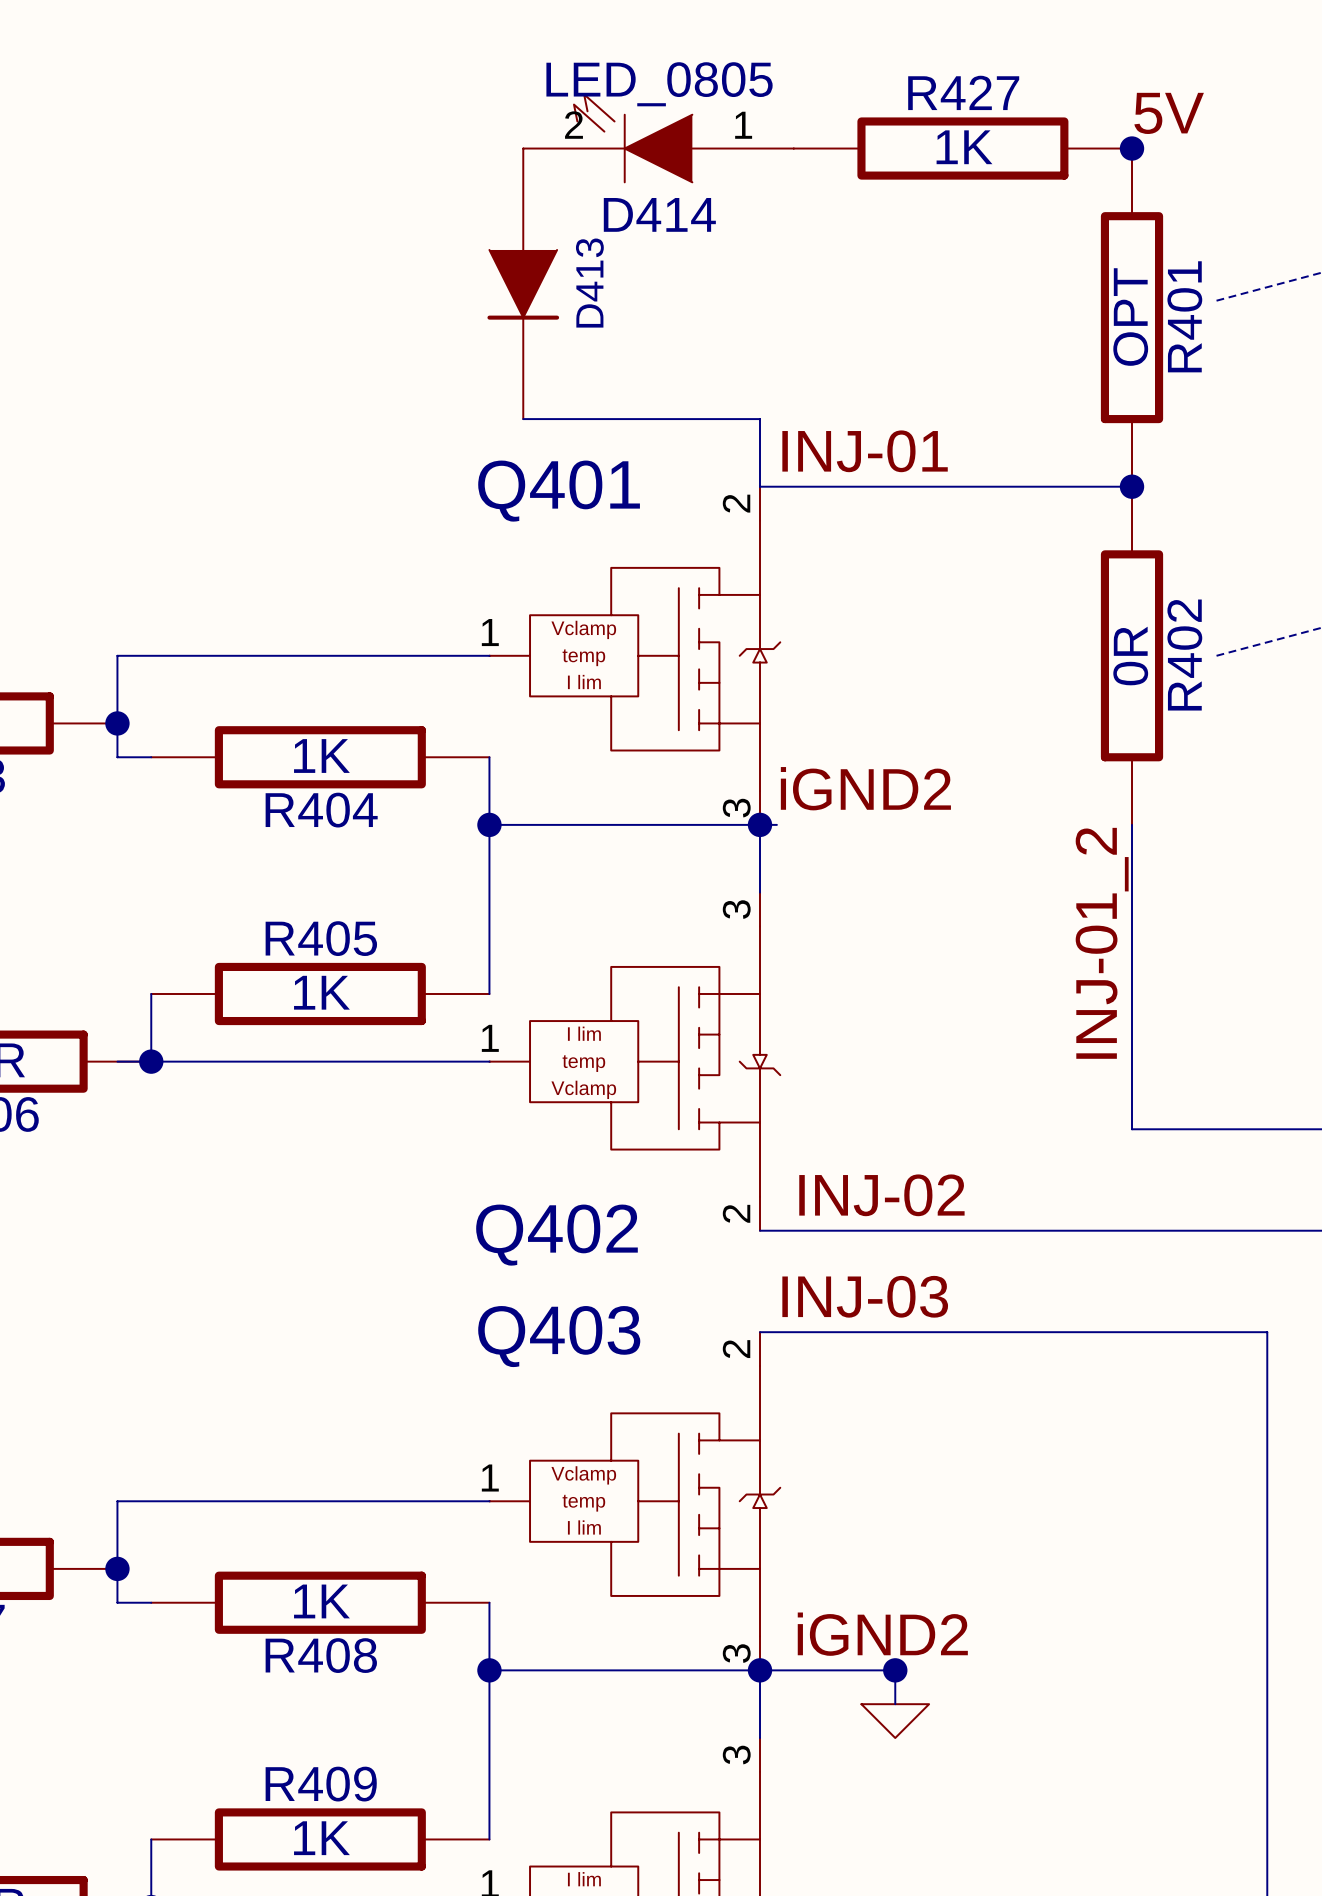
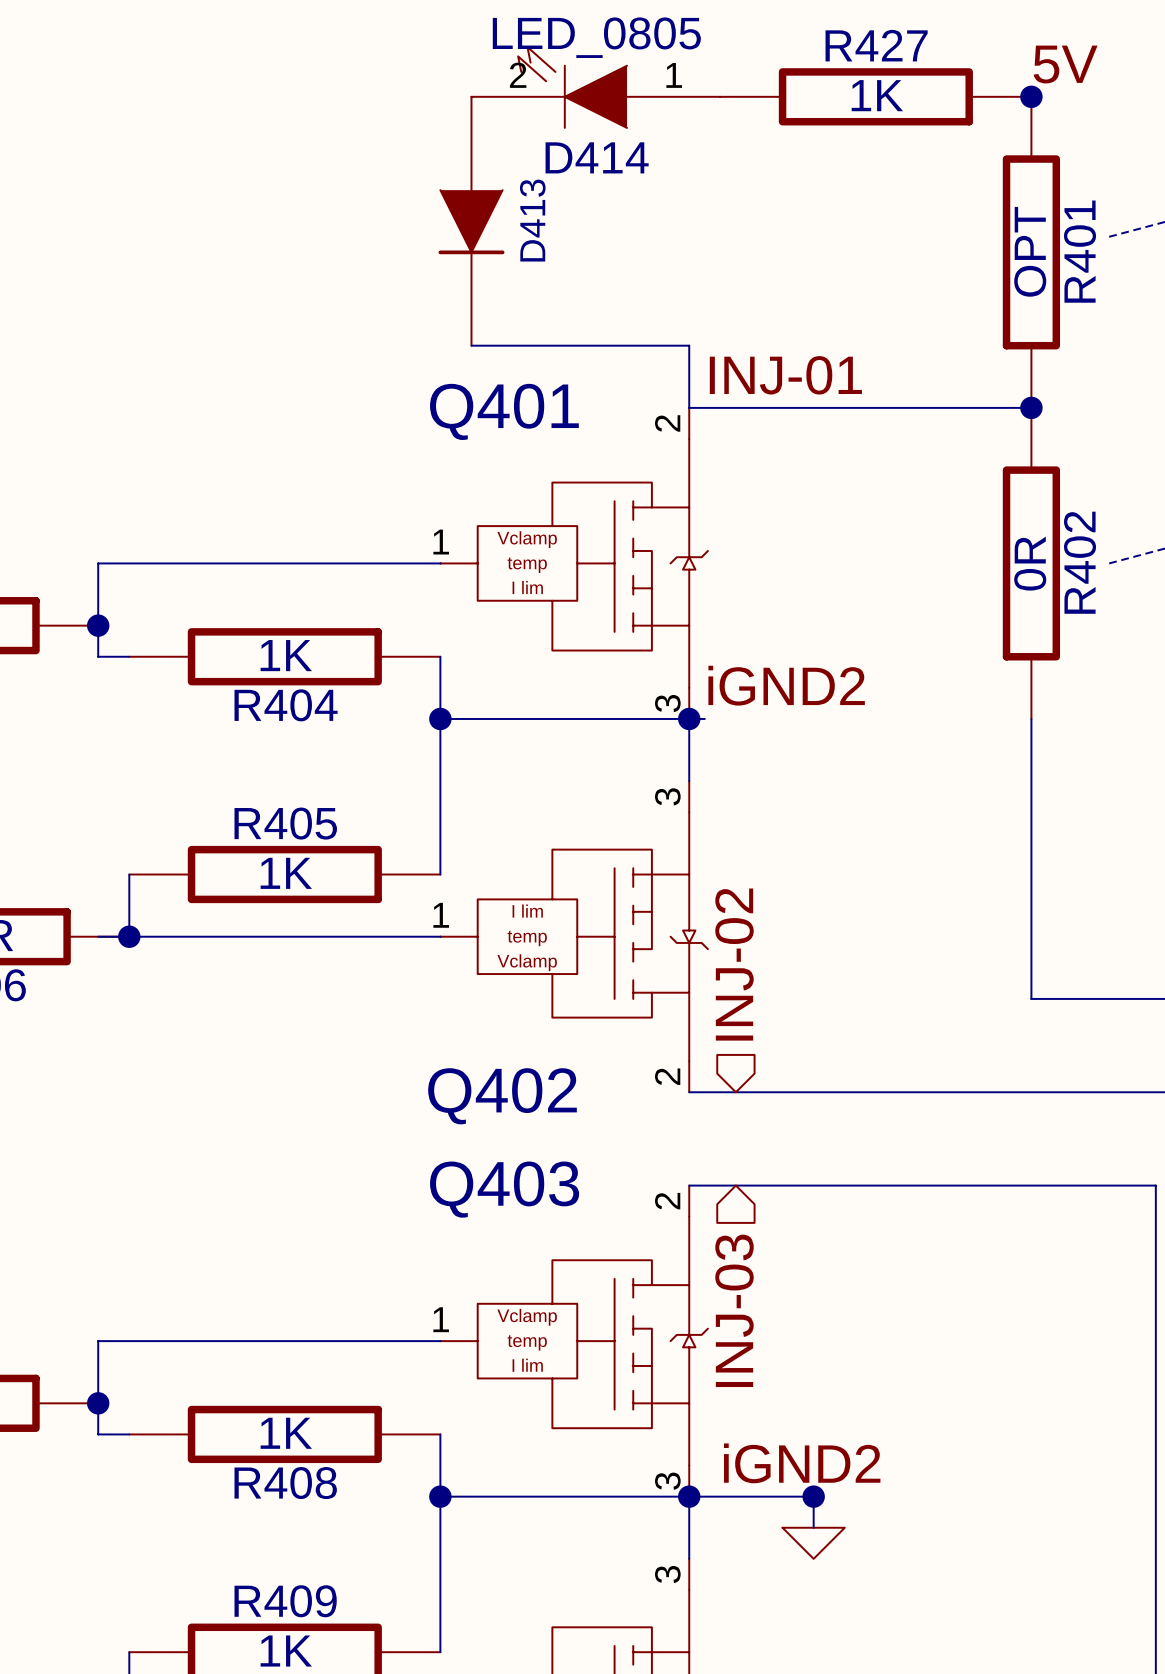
label: INJ-01_2 (1102, 943) -> none
hierarchical label: none -> INJ-02 (734, 964)
label: INJ-02 (881, 1195) -> none
label: INJ-03 (865, 1296) -> none
hierarchical label: none -> INJ-03 (734, 1310)

